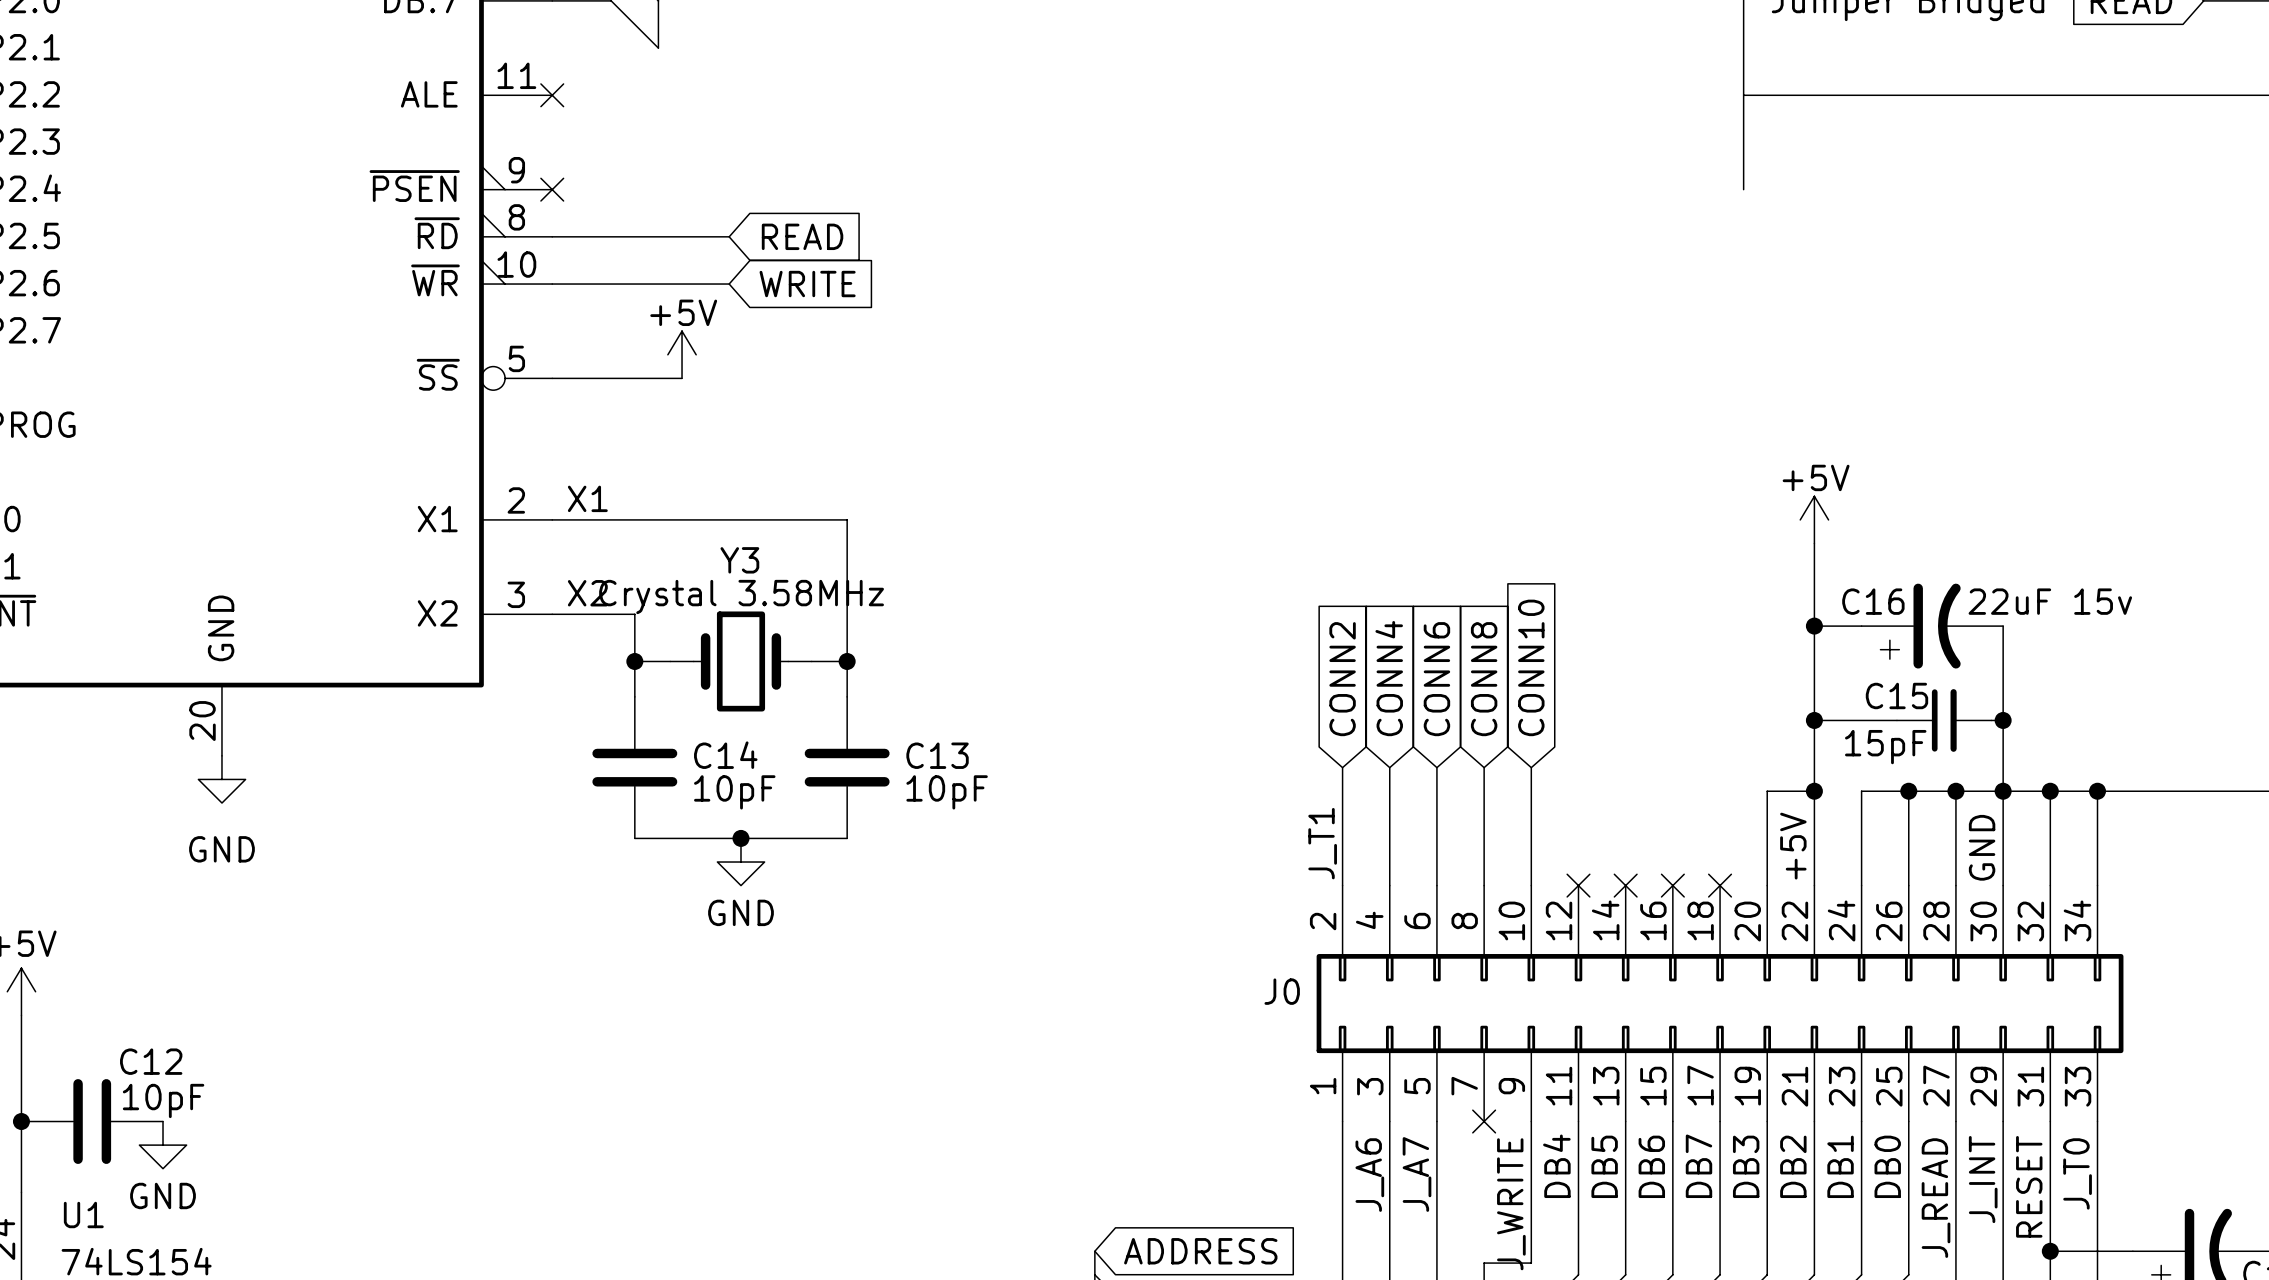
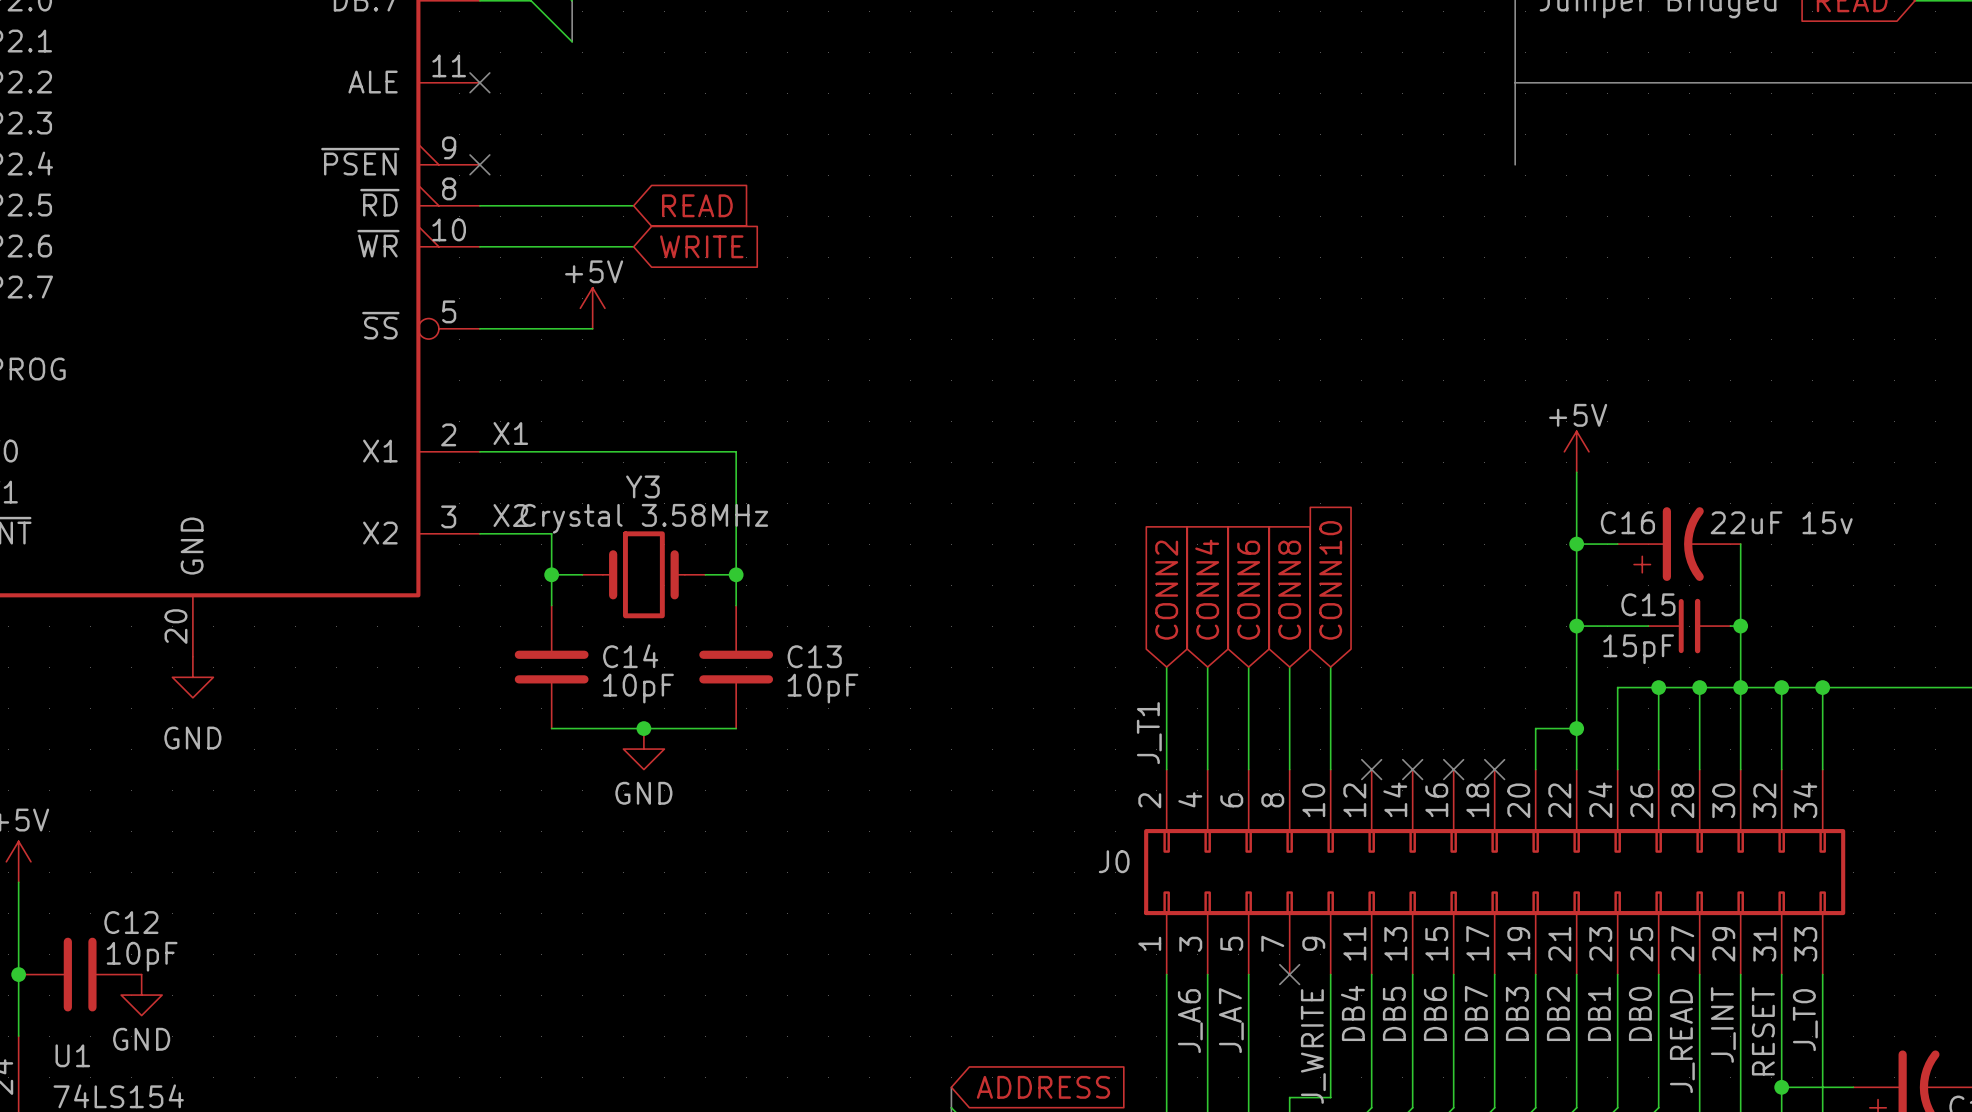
wire: (1814, 791) (1767, 791) (1767, 838) -> (1576, 728) (1535, 728)
junction position: (1814, 791) -> (1576, 728)
label: +5V (1793, 846) -> none
label: GND (1982, 847) -> none

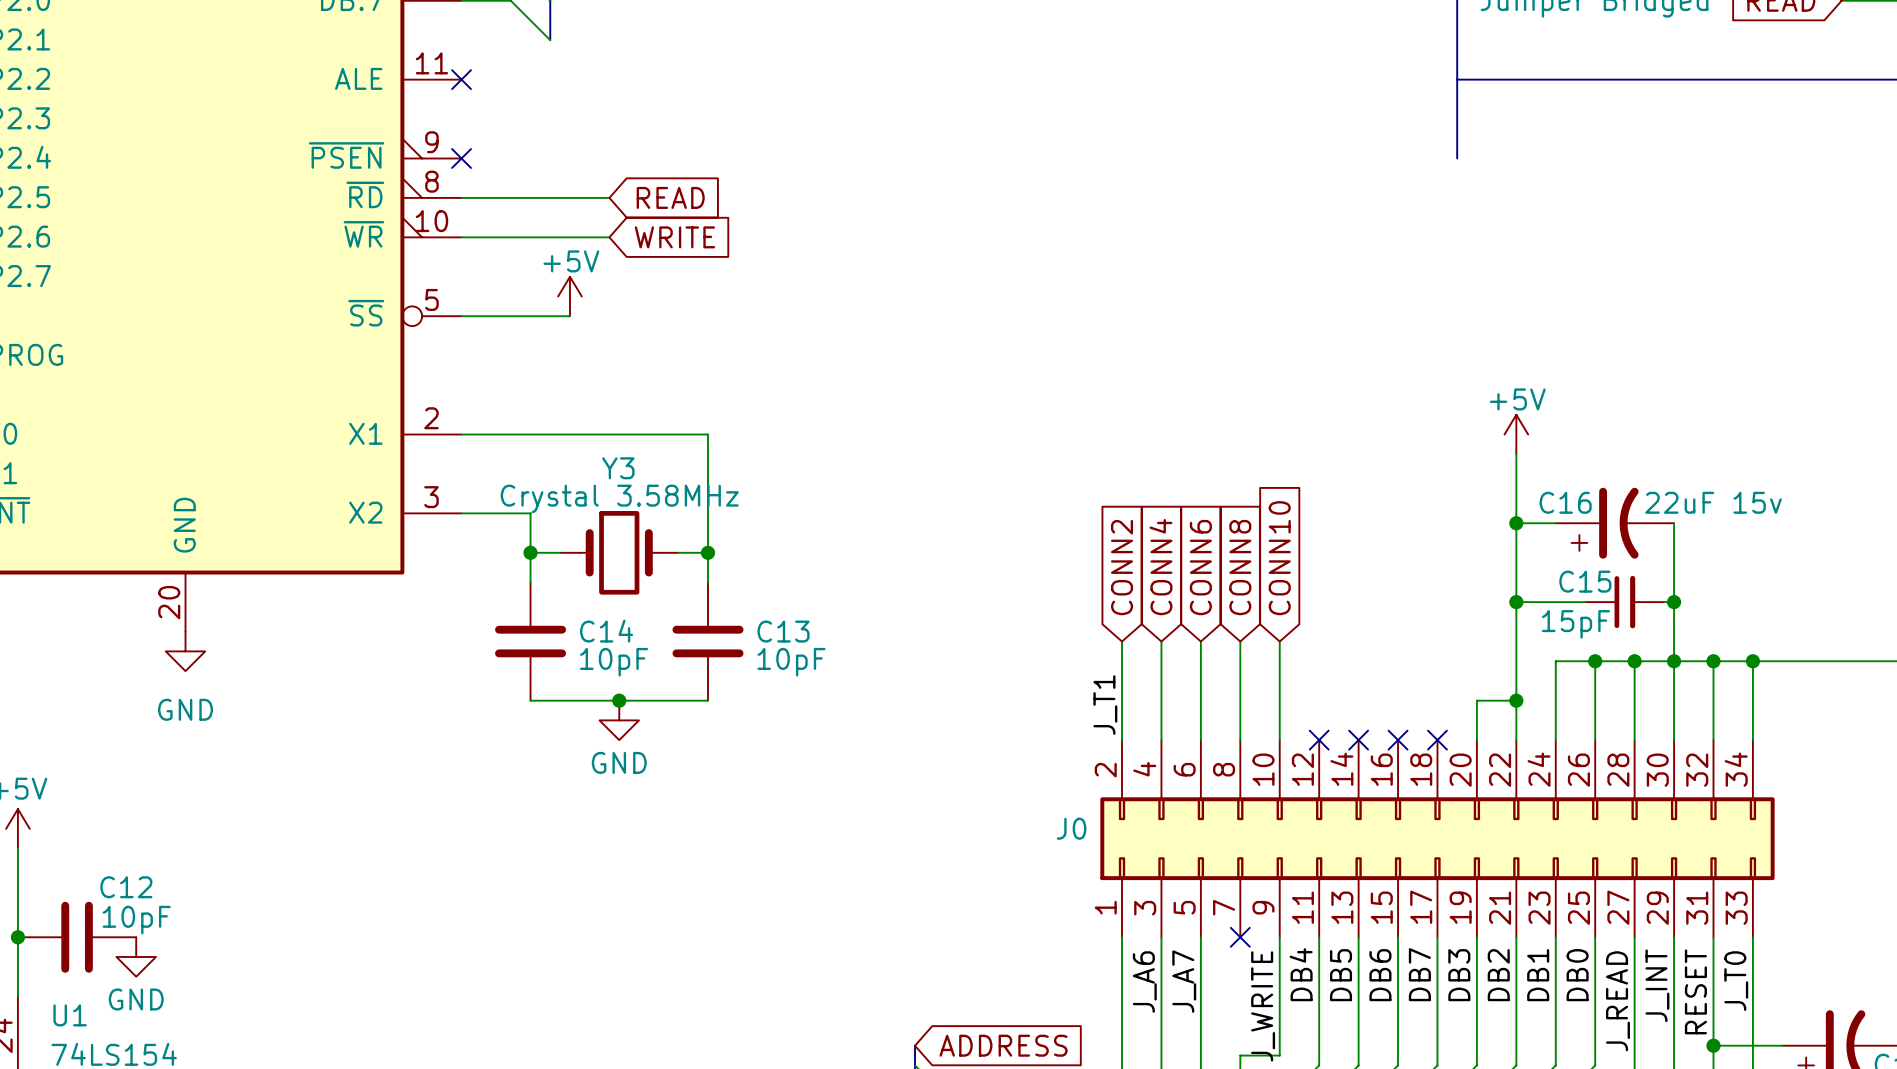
label: X1 (510, 433) -> none
label: X2 (510, 515) -> none

